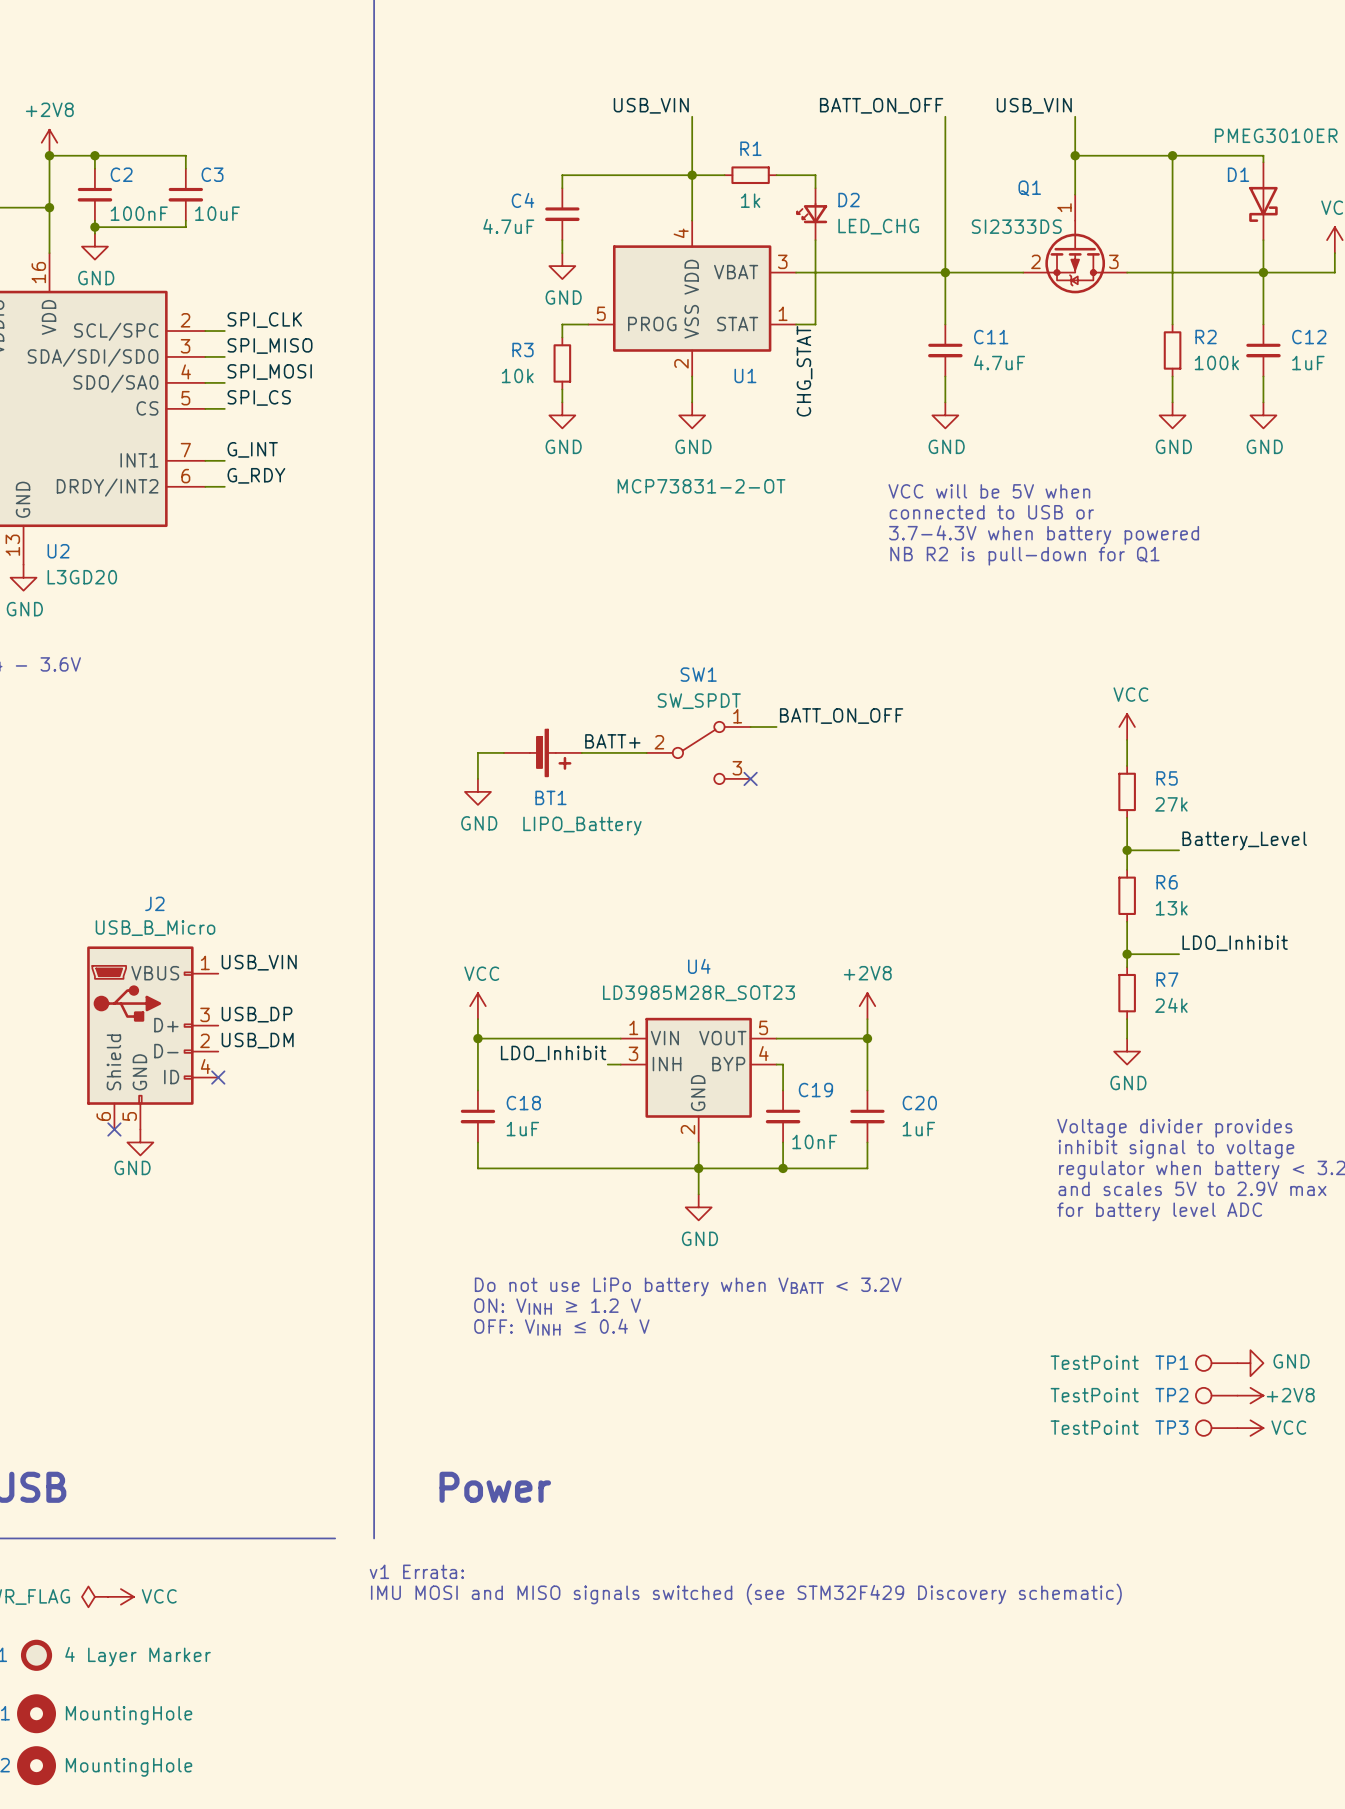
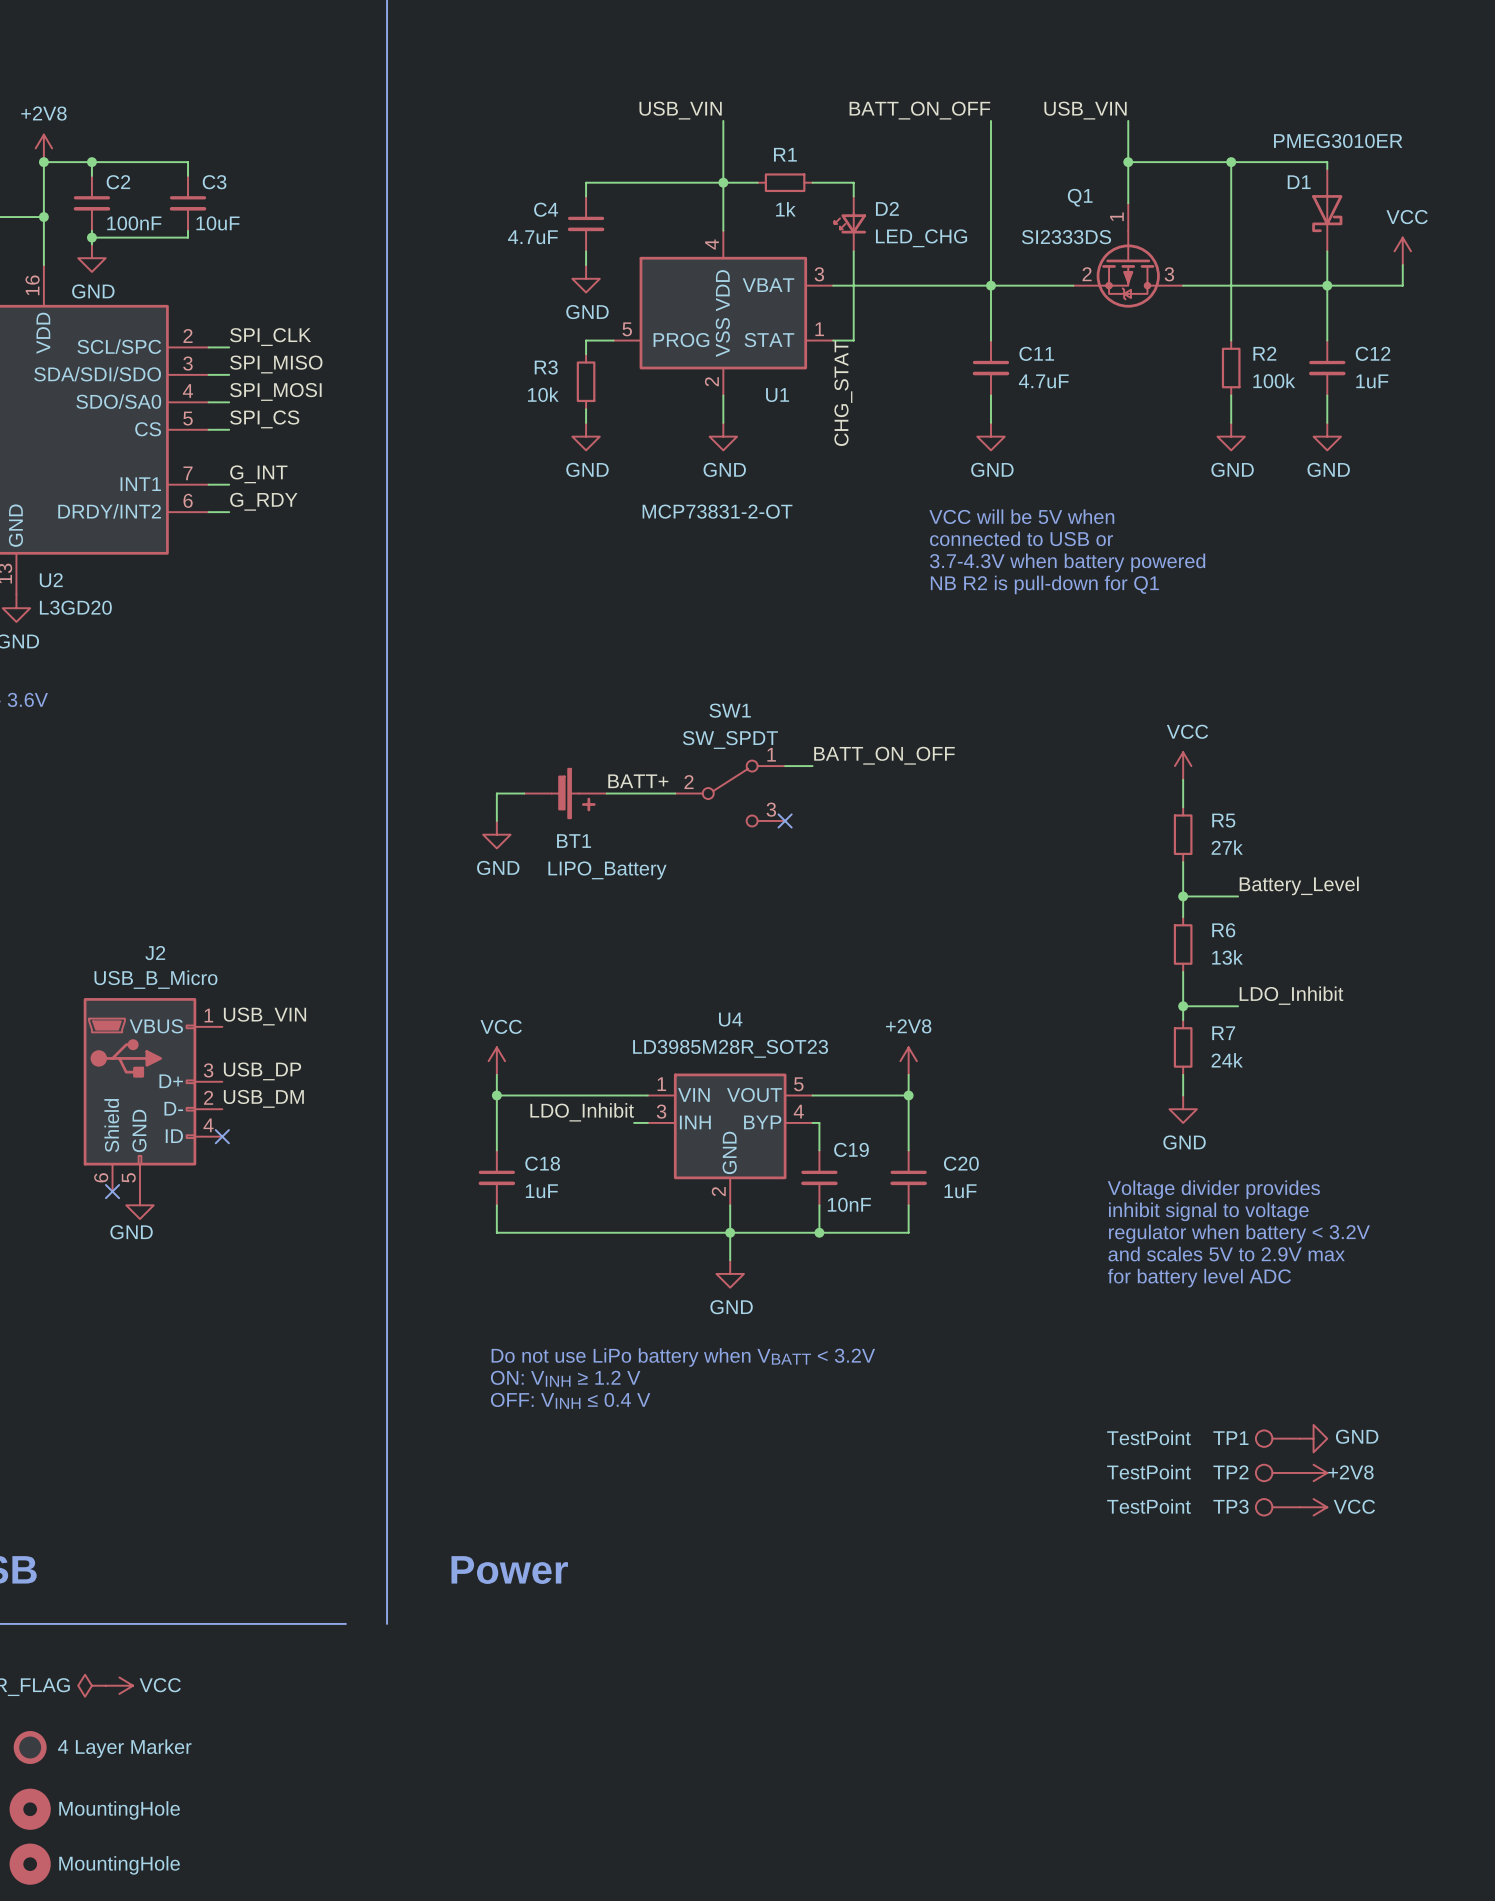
text: v1 Errata: (416, 1571) -> none
text: IMU MOSI and MISO signals switched (see STM32F429 Discovery schematic) (746, 1594) -> none

